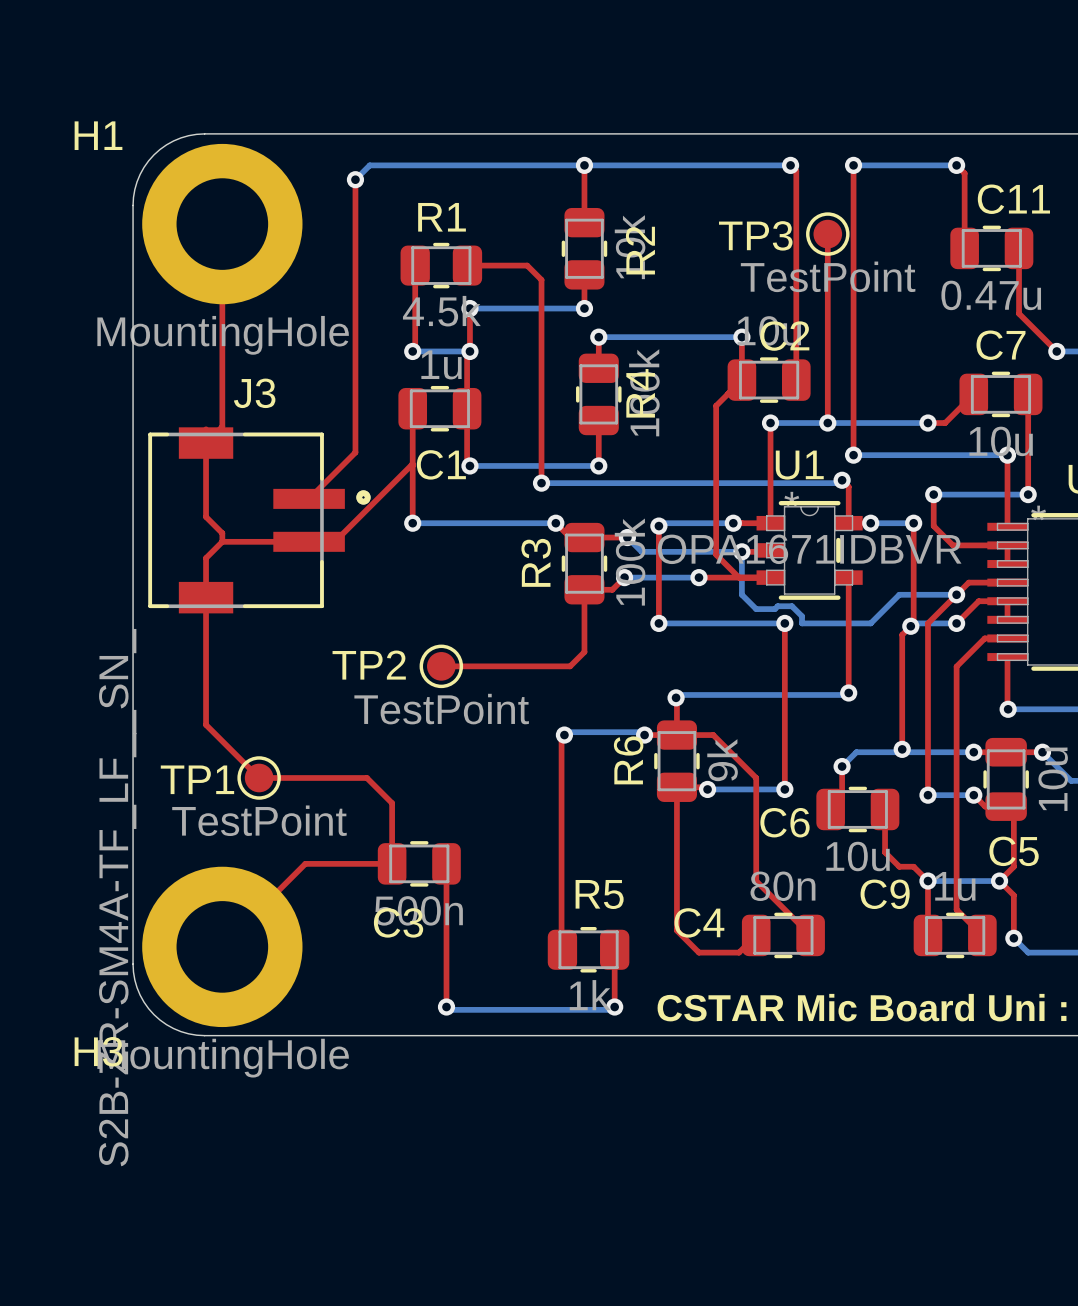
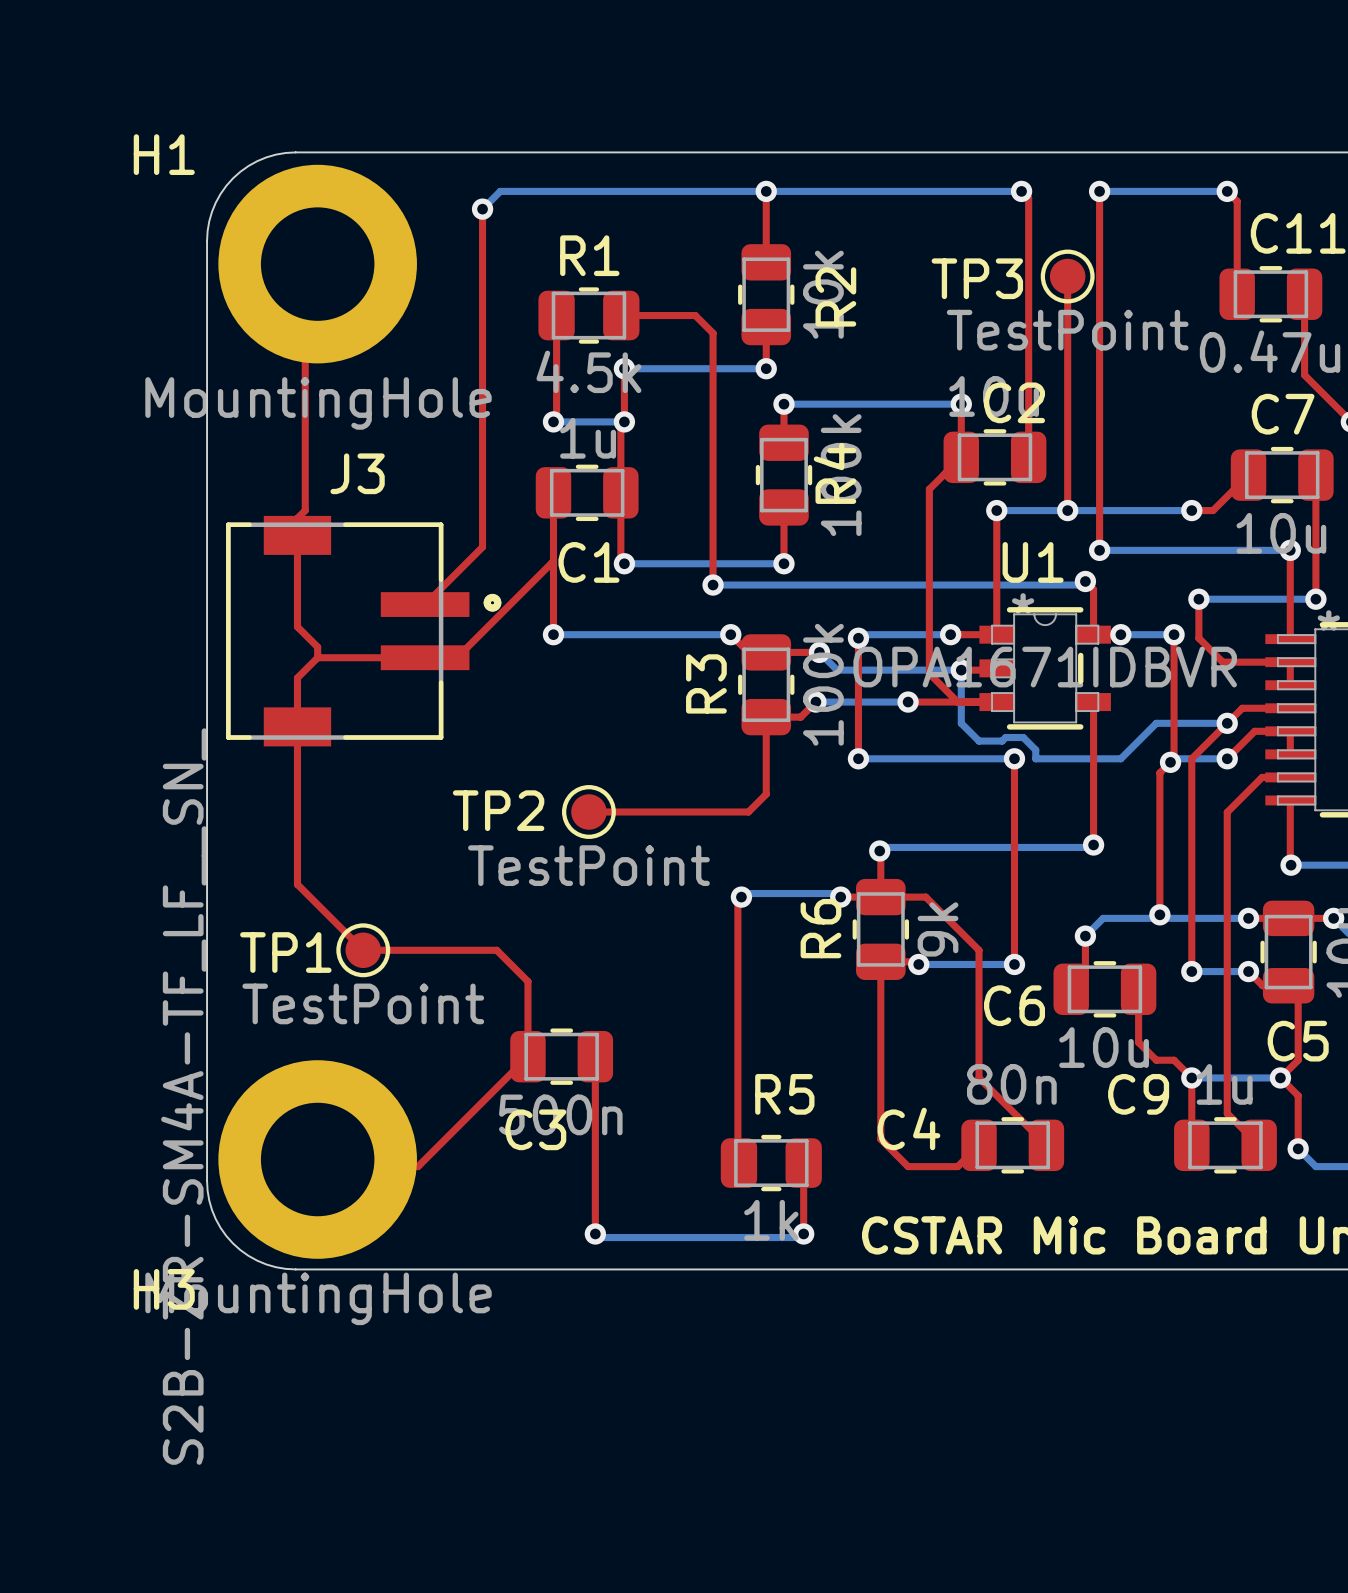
top track: none -> (305, 262) (305, 510) (297, 518)
top track: (222, 224) (222, 426) (206, 443) -> none
top track: (392, 863) (305, 863) (222, 946) -> (527, 1056) (418, 1166) (305, 1166)

